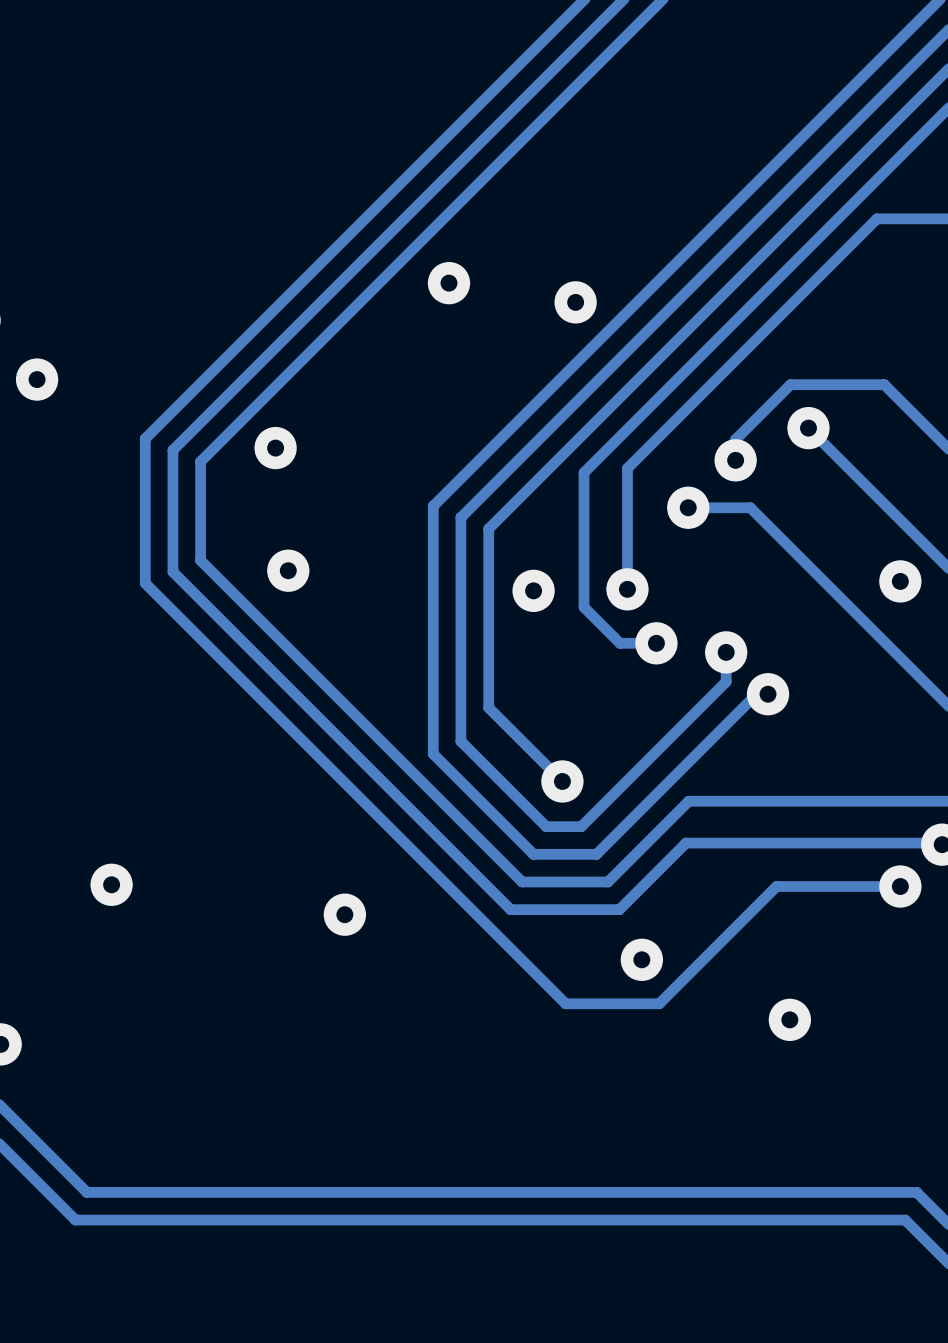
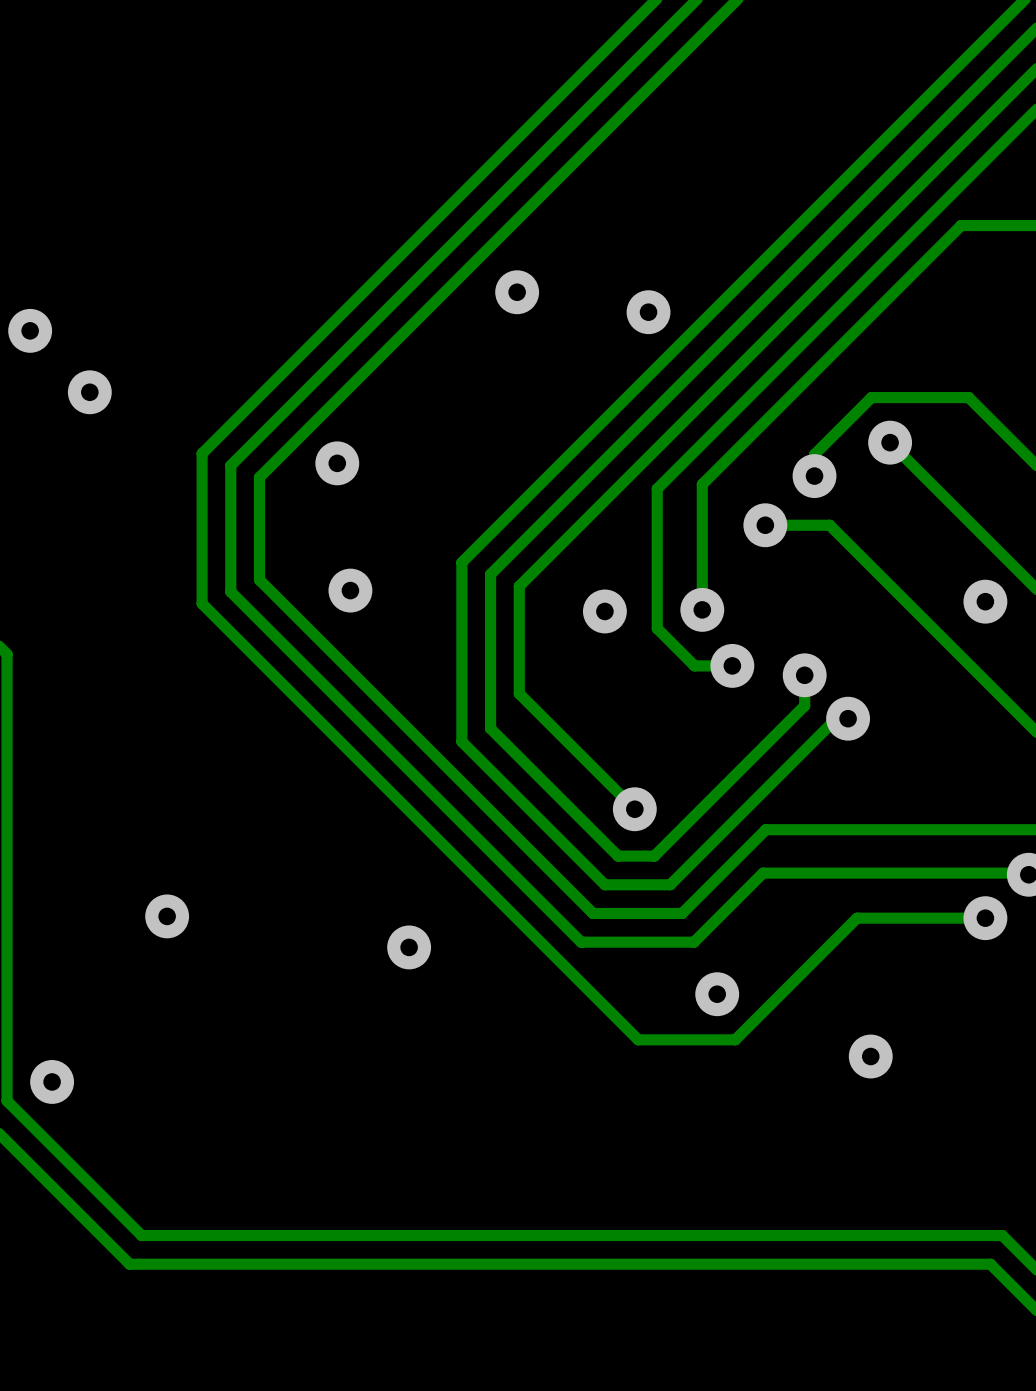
track: (433, 506) (433, 753) -> (500, 523) (461, 562) (461, 741) (500, 780)
track: (460, 517) (460, 741) -> (529, 535) (490, 574) (490, 728) (529, 767)
track: (488, 528) (488, 707) -> (558, 547) (519, 586) (519, 693) (558, 732)

